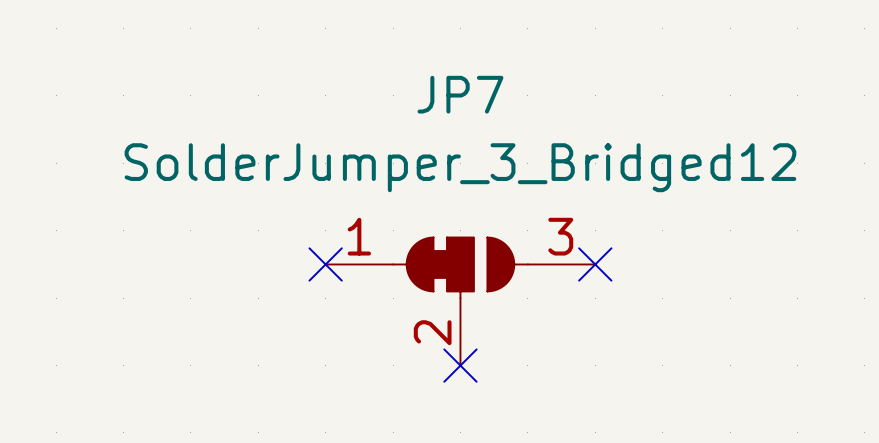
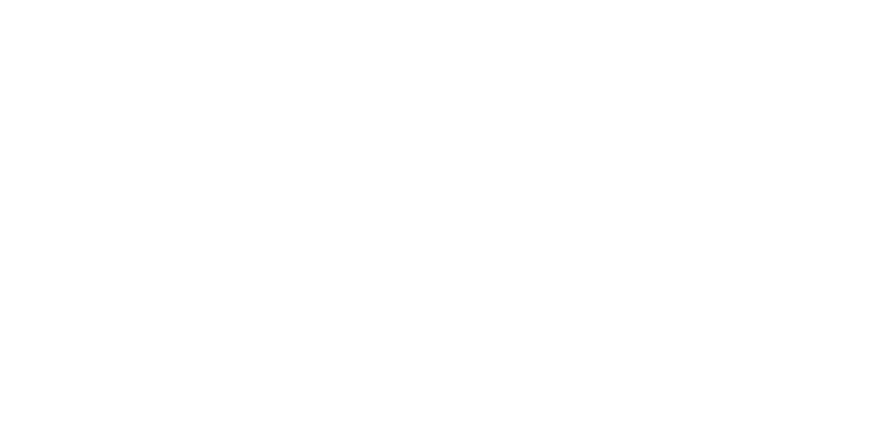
no-connect mark: (325, 264) -> none
no-connect mark: (595, 264) -> none
JP7: SolderJumper_3_Bridged12 (460, 301) -> none
no-connect mark: (460, 365) -> none

